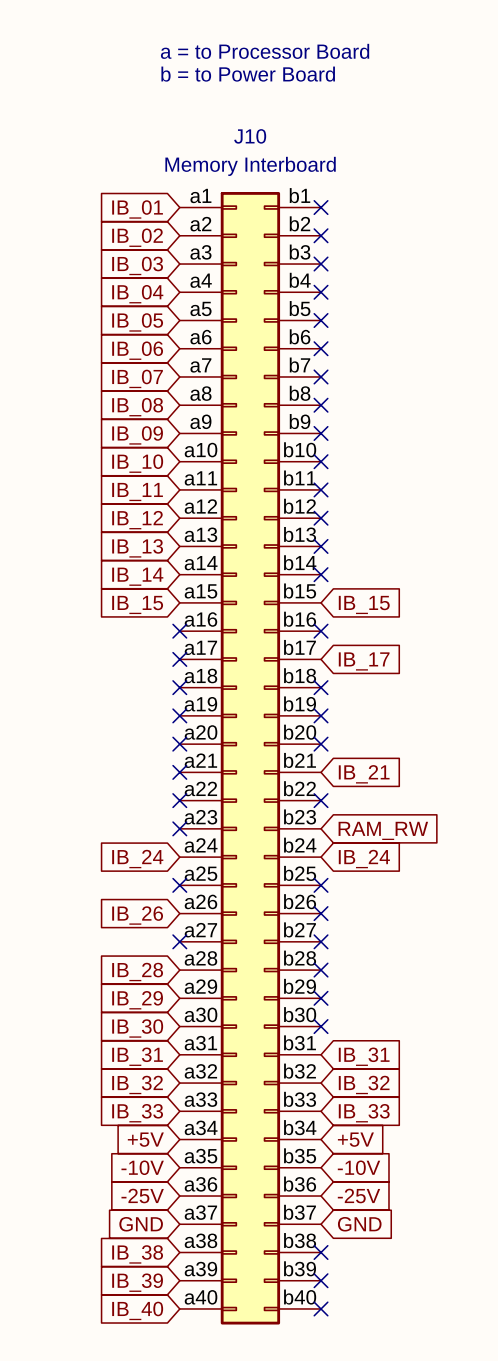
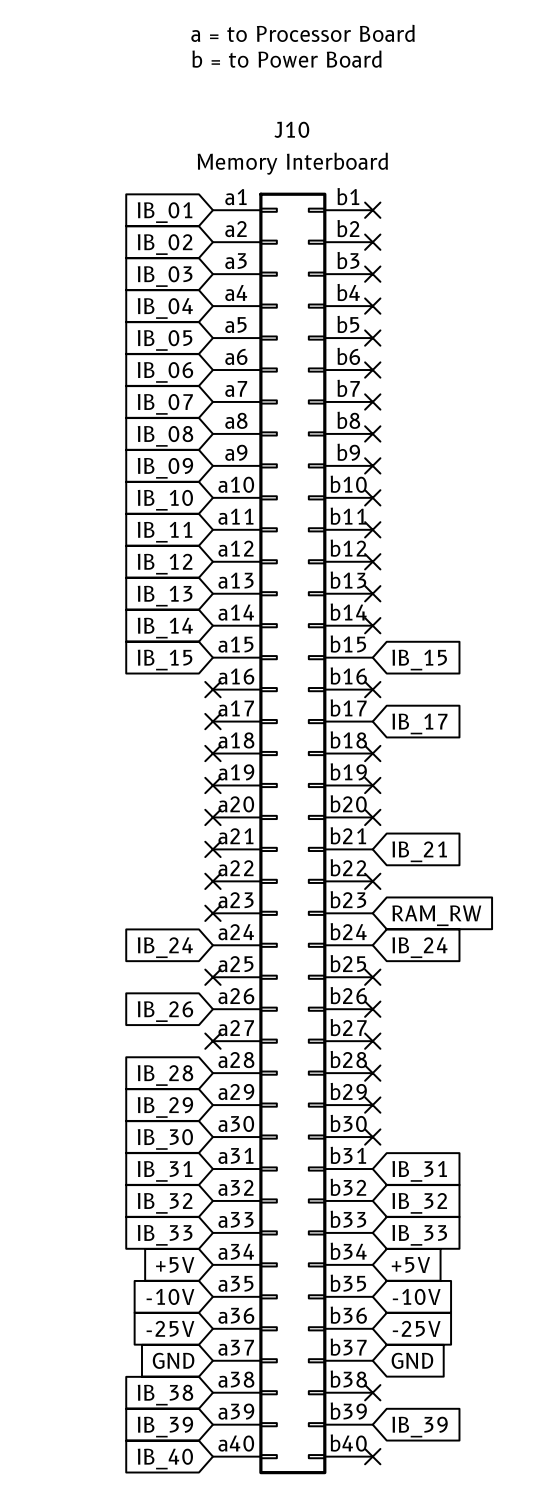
no-connect mark: (321, 1280) -> none
global label: none -> IB_39 (420, 1427)

